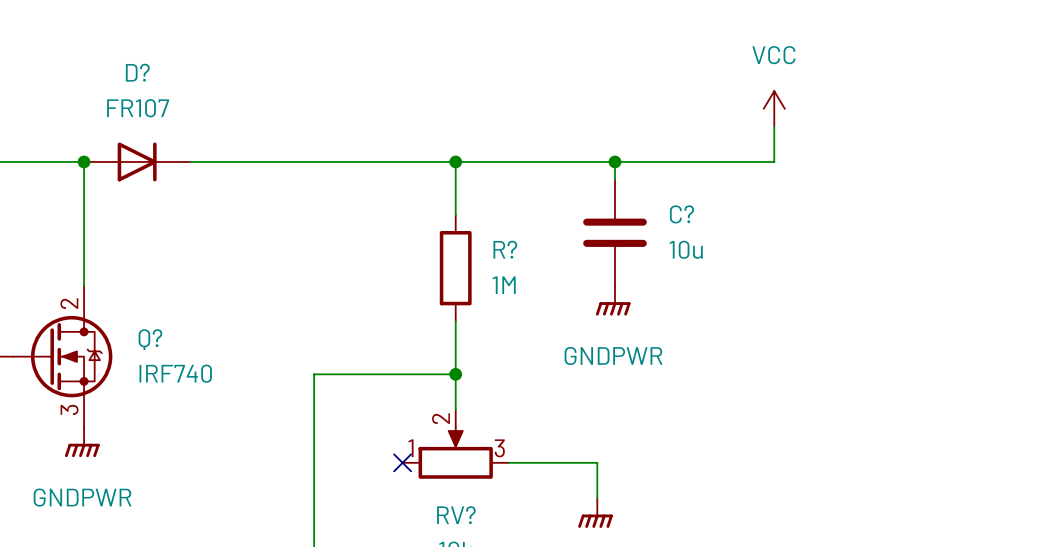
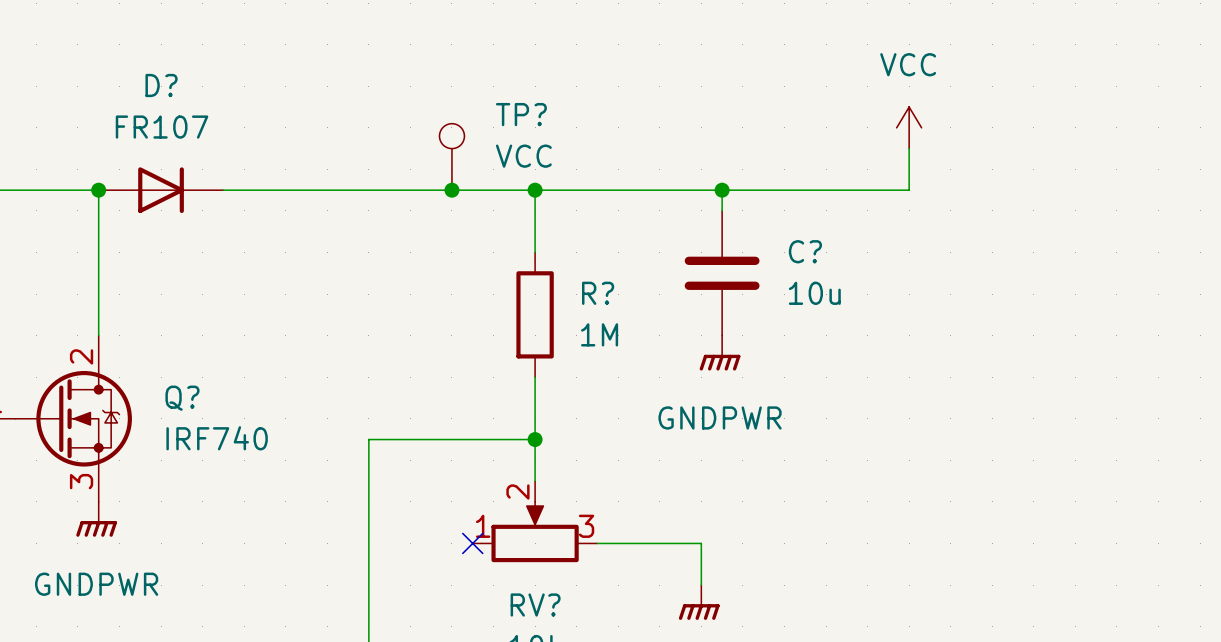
TP?: none -> VCC (451, 156)
junction: none -> (451, 190)

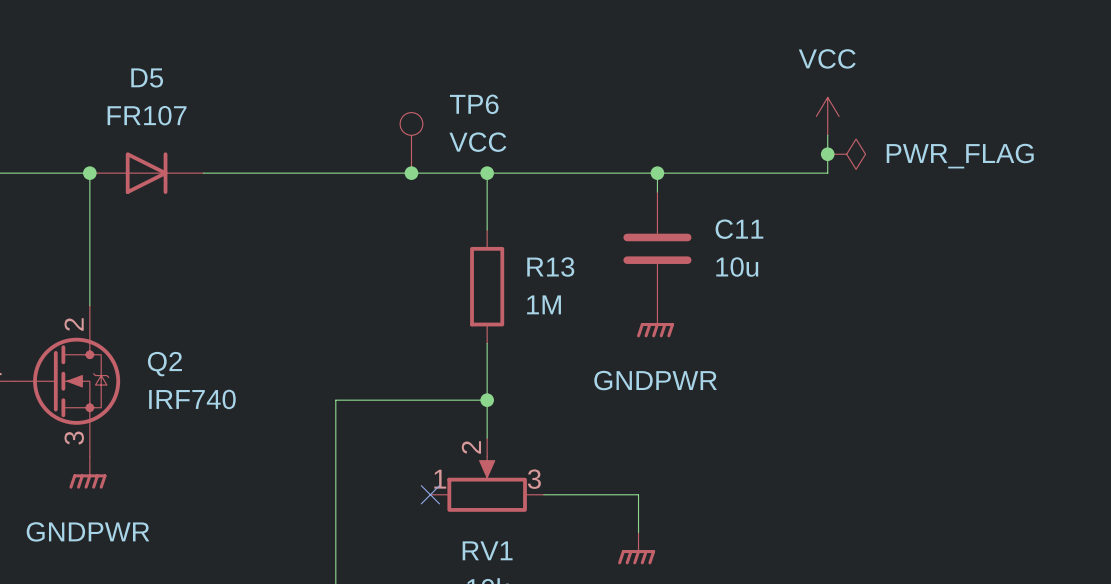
D? name: D? (161, 85) -> D5 (147, 77)
TP? name: TP? (521, 114) -> TP6 (474, 104)
junction: none -> (827, 154)
power symbol: none -> PWR_FLAG (846, 154)
C? name: C? (805, 251) -> C11 (739, 229)
R? name: R? (598, 293) -> R13 (550, 267)
Q? name: Q? (182, 398) -> Q2 (164, 364)
RV? name: RV? (535, 605) -> RV1 (487, 550)

